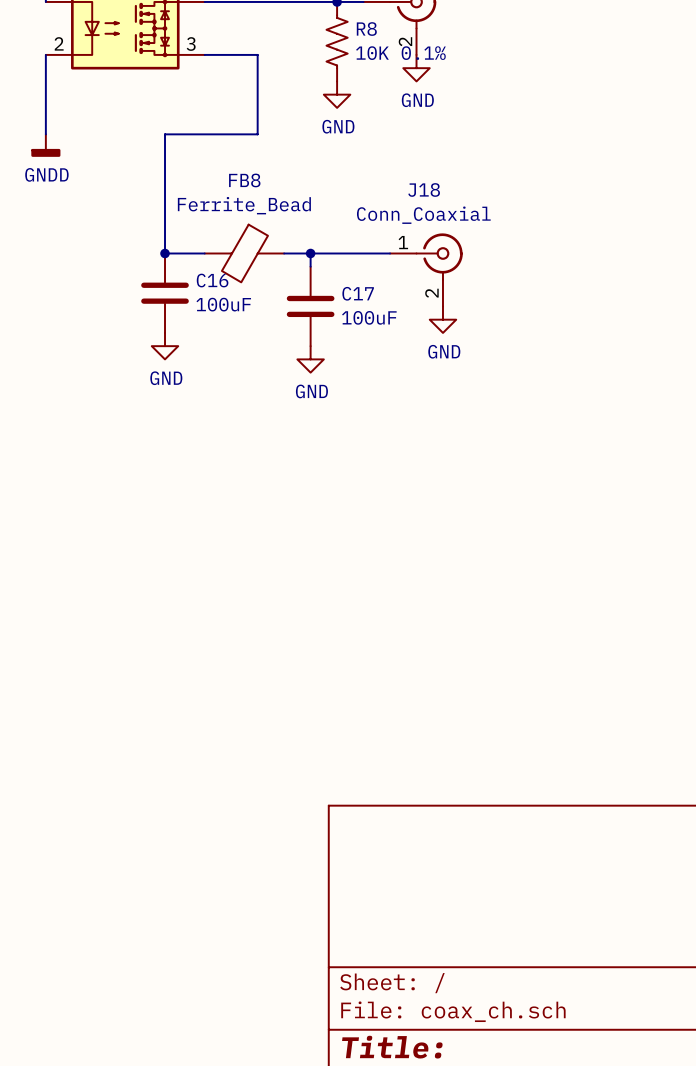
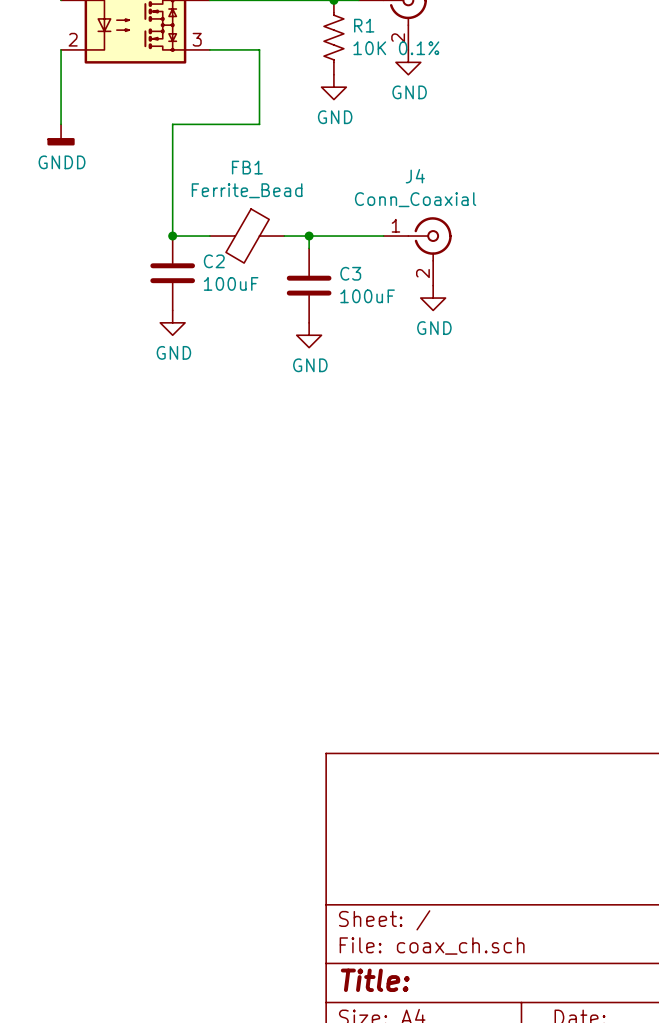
R8 name: R8 (366, 29) -> R1 (364, 25)
FB8 name: FB8 (244, 180) -> FB1 (247, 167)
J18 name: J18 (424, 189) -> J4 (415, 176)
C16 name: C16 (212, 280) -> C2 (214, 261)
C17 name: C17 (358, 293) -> C3 (350, 273)

